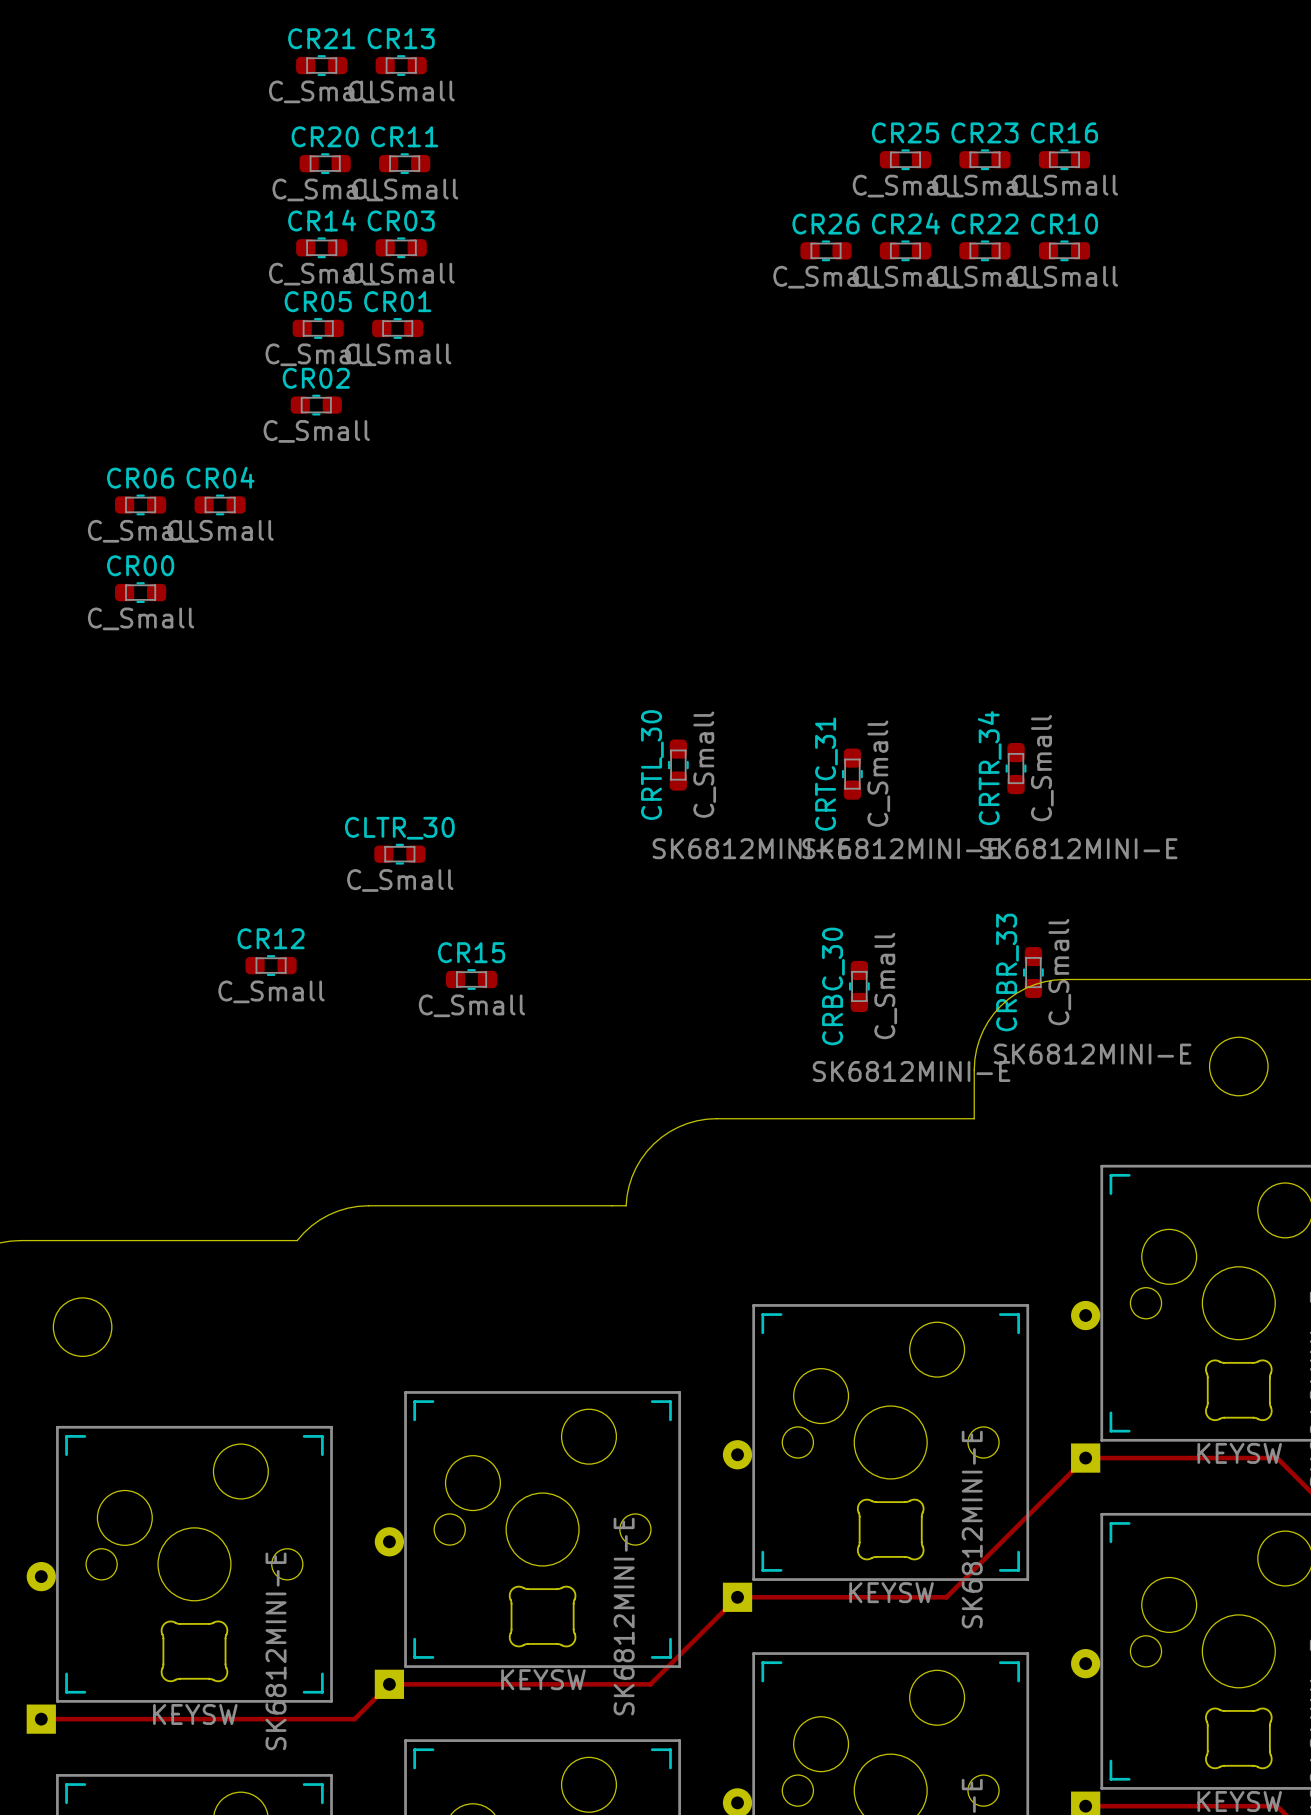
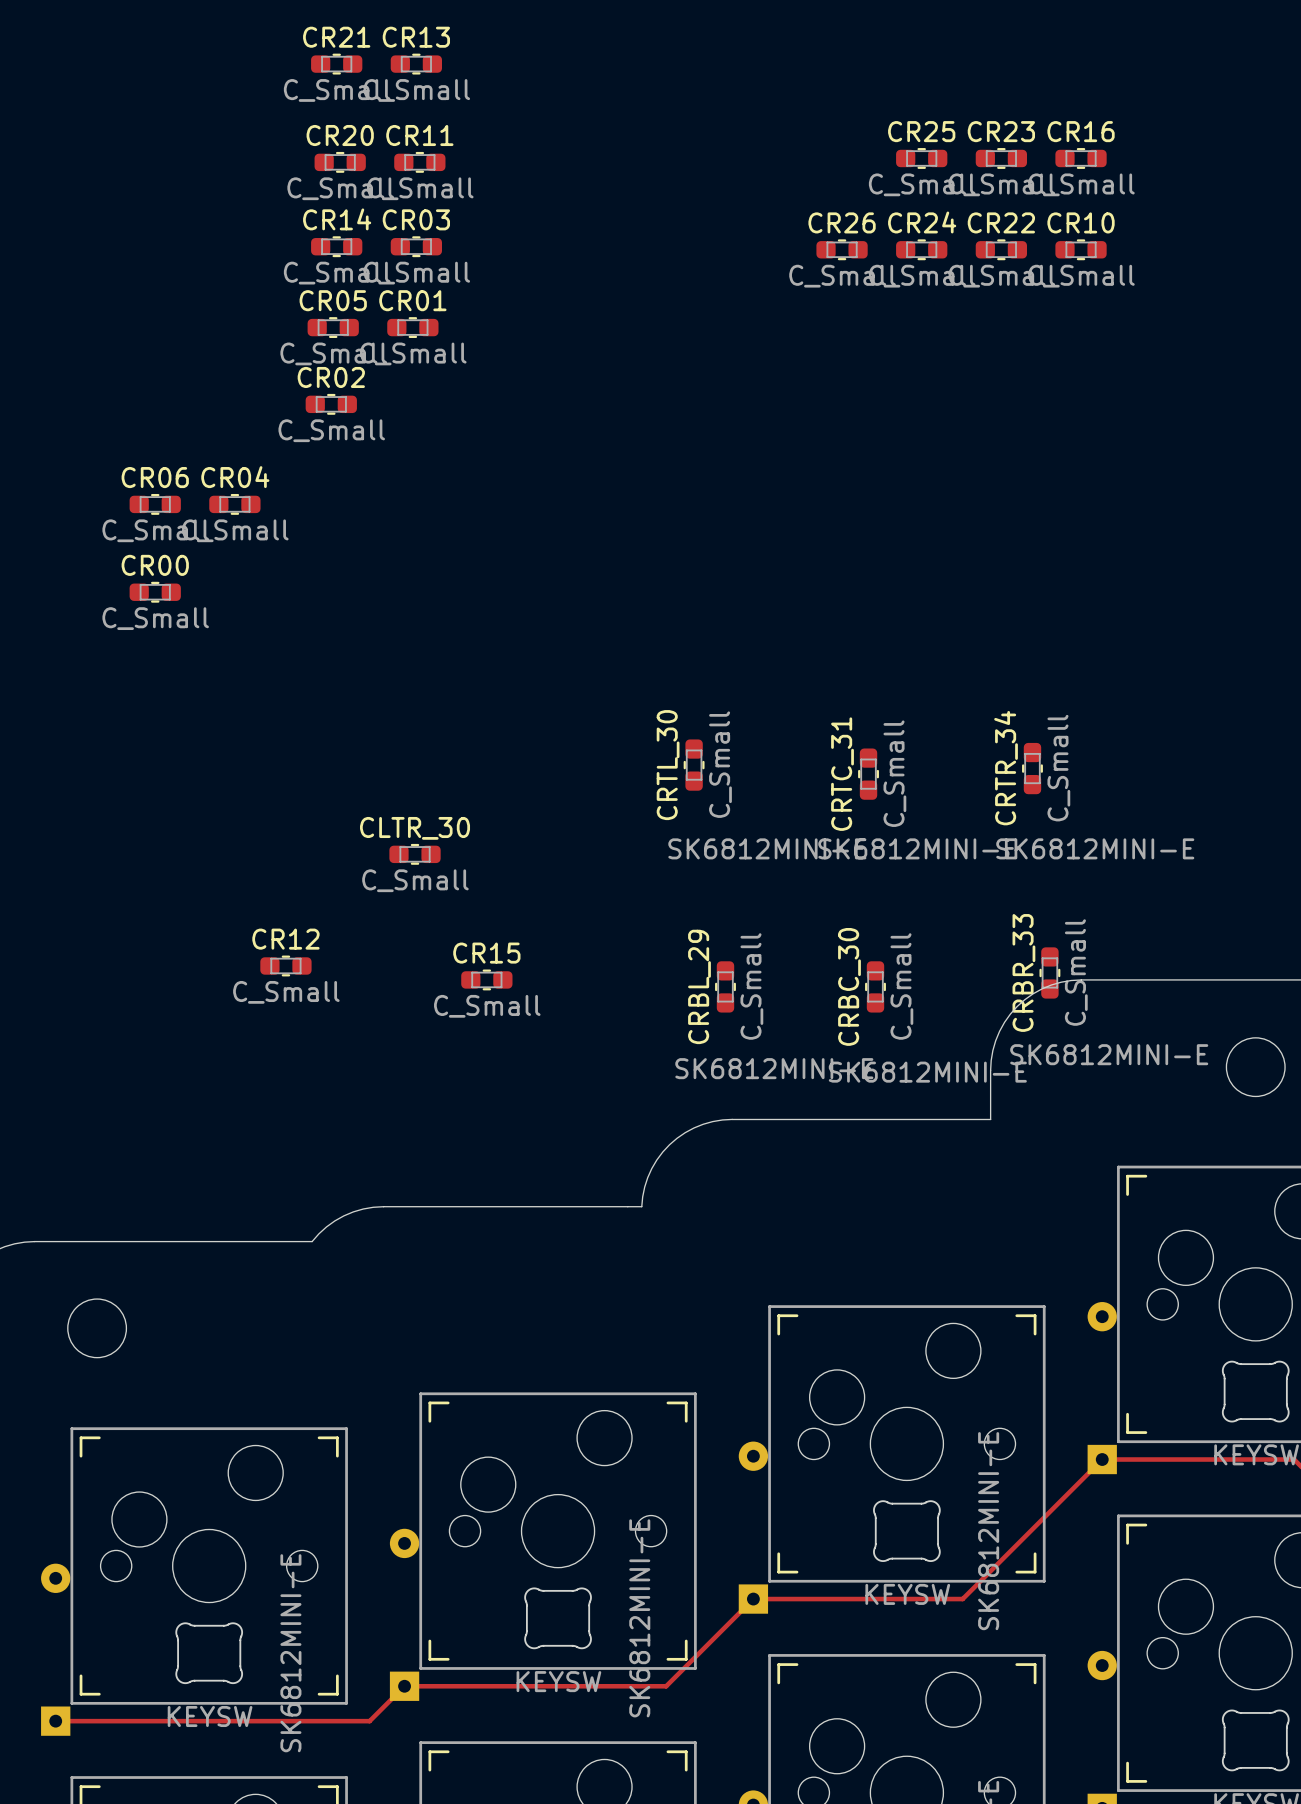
CRBL_29: none -> C_Small (725, 986)
part: none -> SK6812MINI-E (774, 1068)

